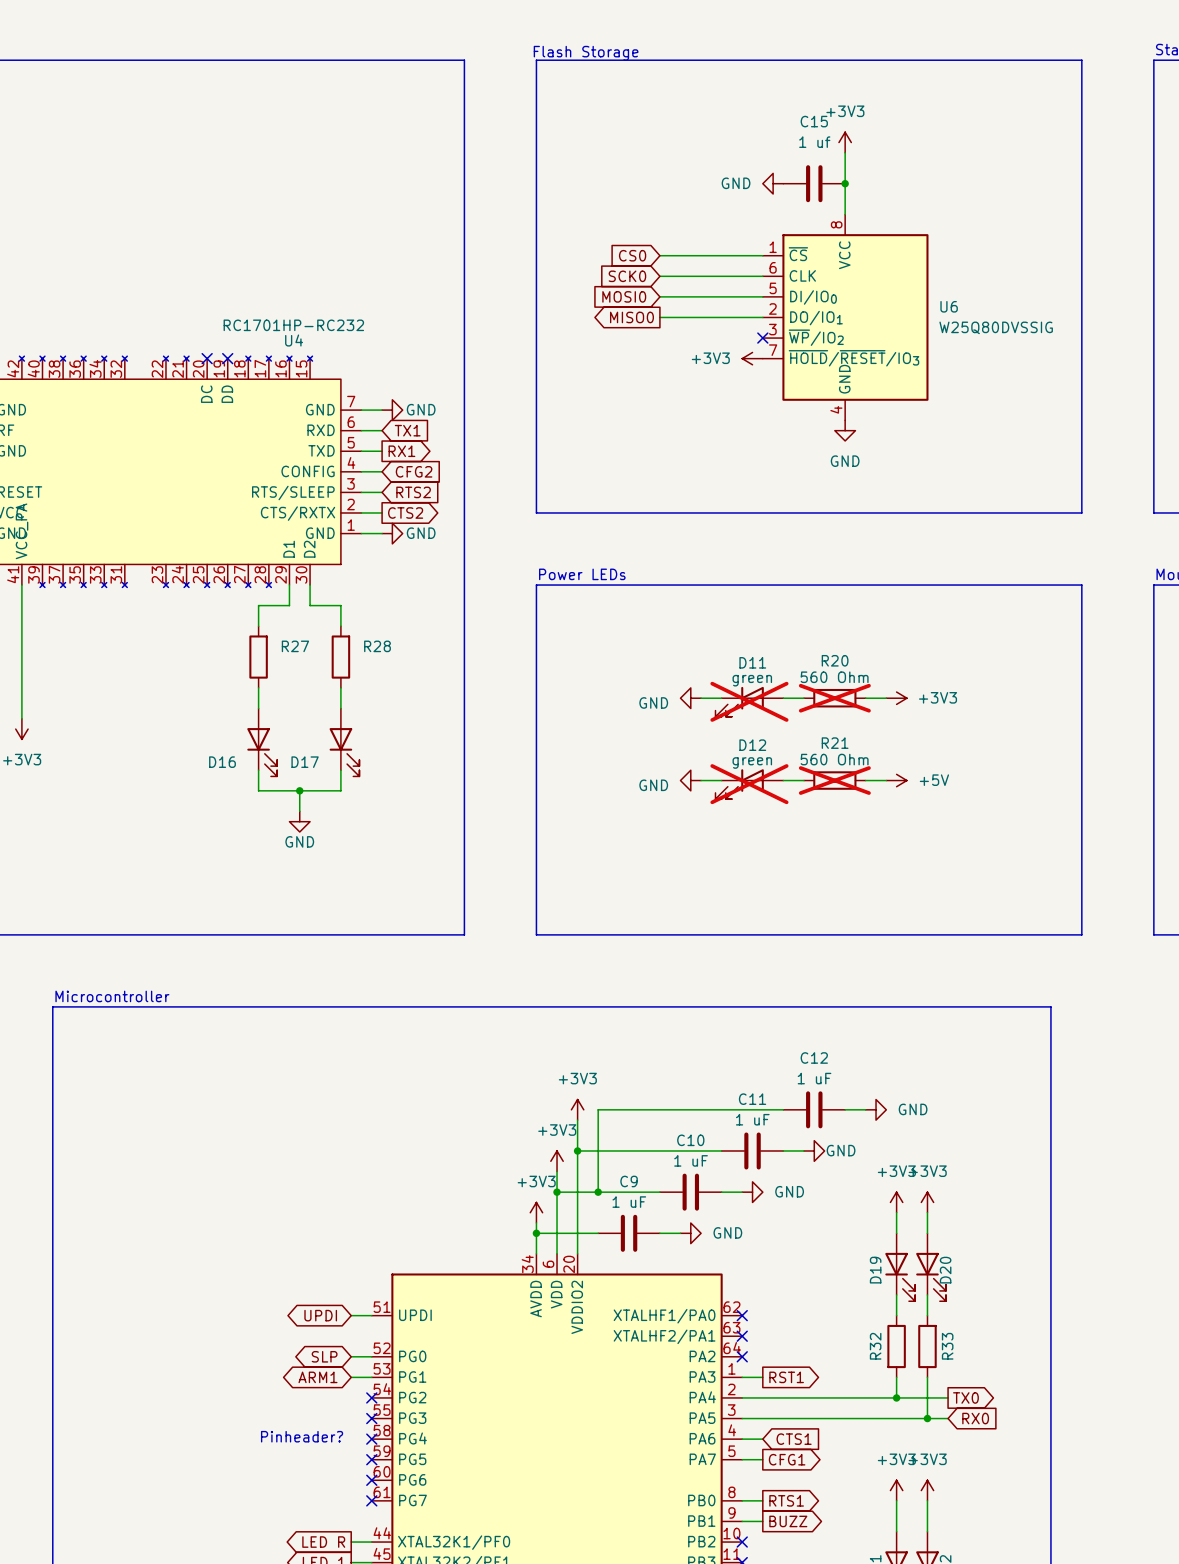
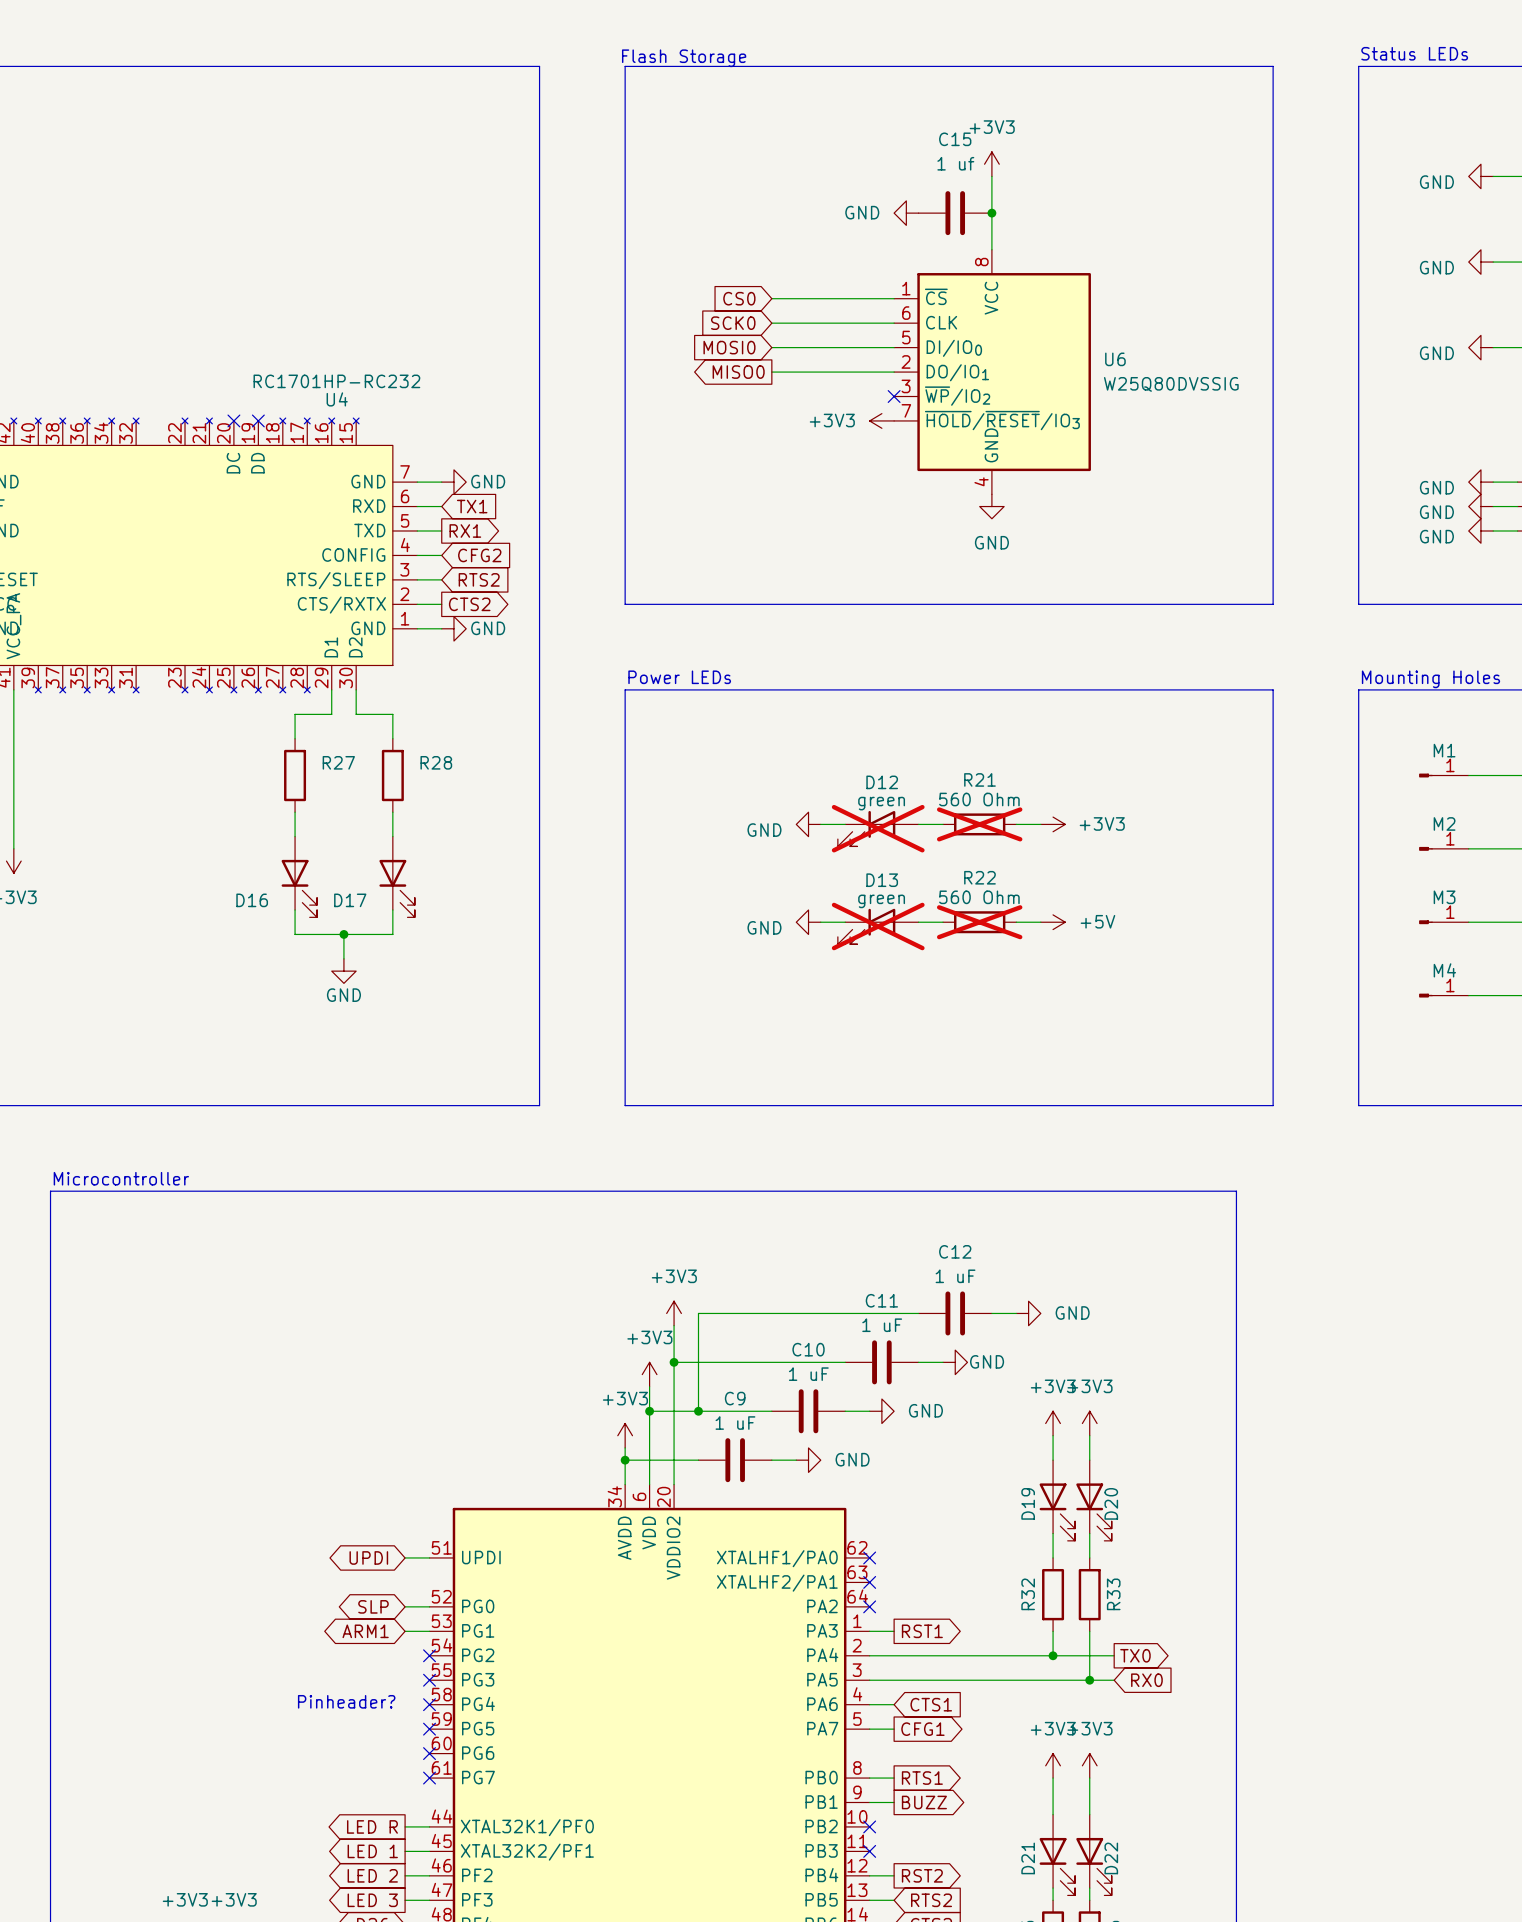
R20 name: R20 (835, 660) -> R21 (979, 779)
D11 name: D11 (752, 662) -> D12 (882, 782)
R21 name: R21 (835, 743) -> R22 (979, 877)
D12 name: D12 (752, 745) -> D13 (882, 880)

